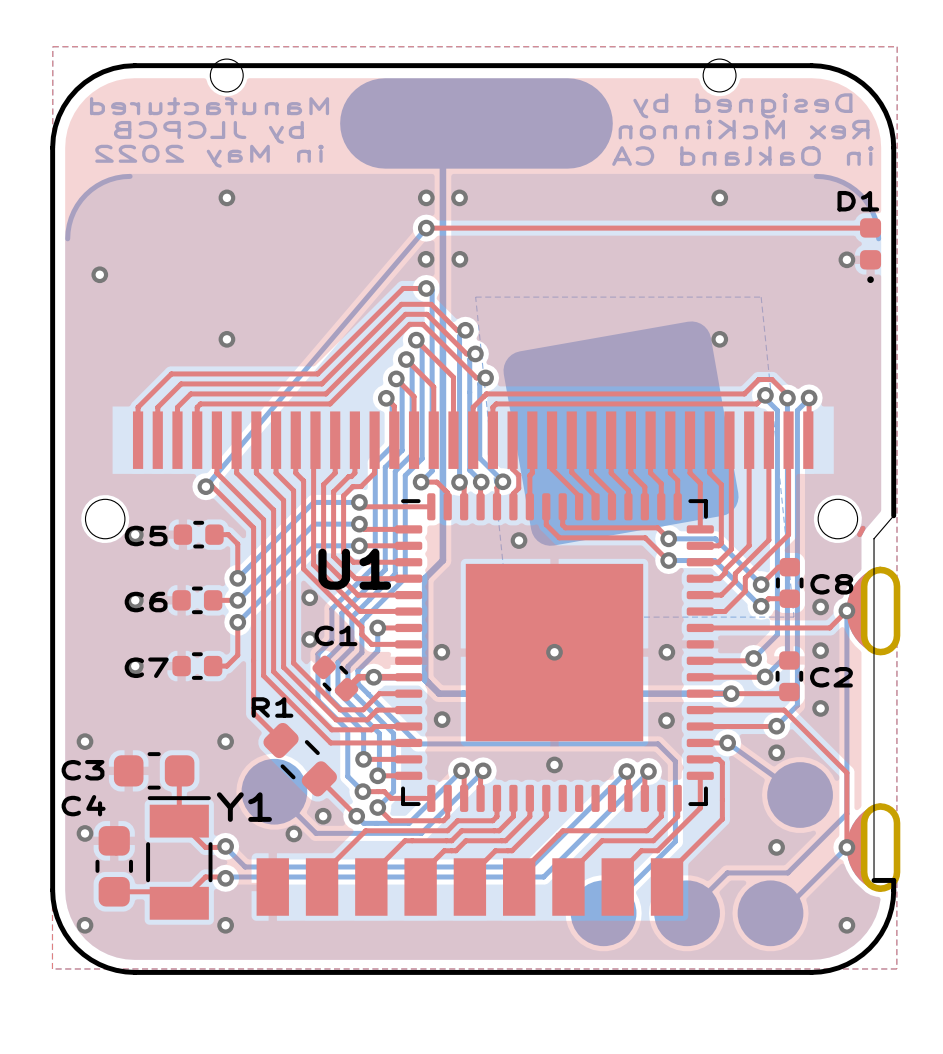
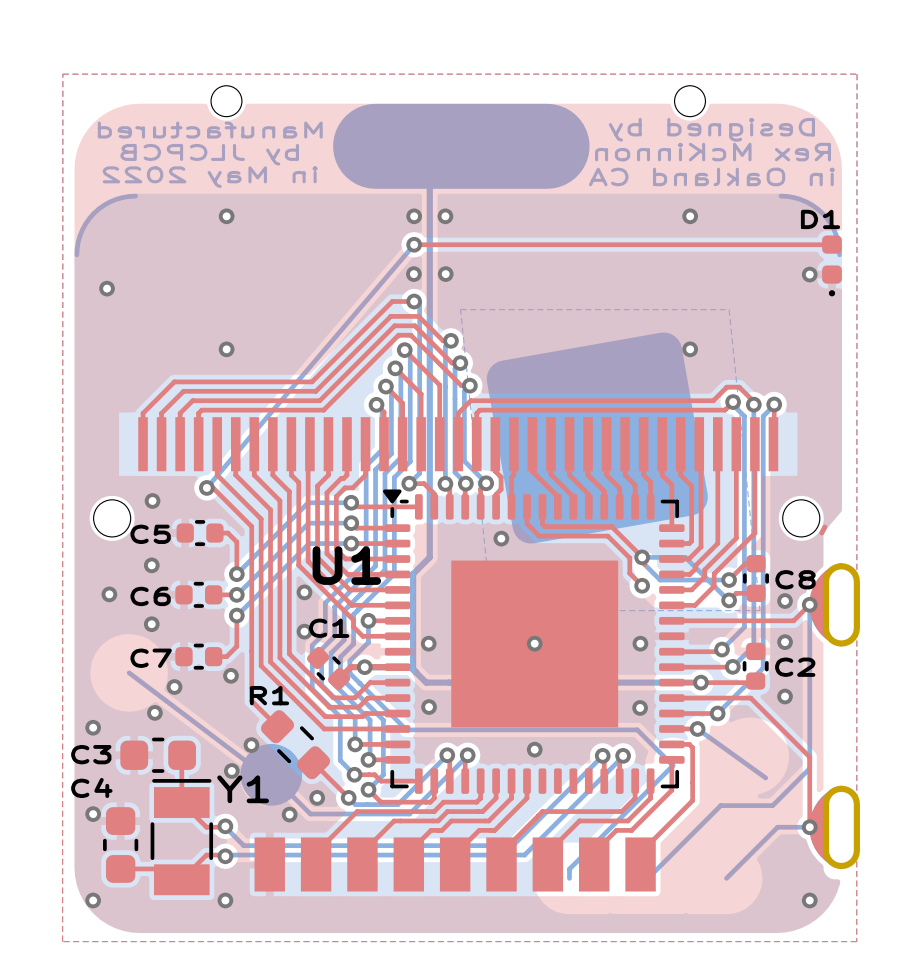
board edge: (134, 65) (811, 65) (829, 67) (847, 73) (862, 83) (875, 96) (889, 120) (893, 147) (893, 515) (874, 538) (874, 880) (893, 880) (893, 890) (891, 908) (885, 925) (875, 941) (862, 954) (838, 967) (811, 972) (134, 972) (116, 970) (99, 964) (83, 954) (70, 941) (57, 917) (52, 890) (53, 137) (63, 106) (84, 82) (113, 68) (134, 65) -> none
U1 footprint: [395, 493, 714, 812] -> [383, 489, 685, 794]
via: none -> (152, 500)
top track: (636, 527) (657, 527) (668, 538) -> (611, 526) (644, 559) (644, 564)
via: (135, 534) -> none
top track: (632, 537) (645, 537) (668, 560) -> (607, 536) (629, 558) (629, 573) (642, 585)
bottom track: (668, 538) (715, 538) (761, 584) -> (644, 564) (660, 580) (729, 580)
via position: (668, 538) -> (642, 585)
via: none -> (151, 565)
via: none -> (109, 594)
via: (135, 600) -> none
via: none -> (151, 624)
via: (135, 666) -> none
bottom track: (797, 678) (797, 705) (776, 726) -> (763, 667) (717, 713)
bottom track: none -> (129, 672) (268, 777)
via: none -> (230, 675)
via: none -> (174, 687)
via: none -> (154, 712)
top track: (748, 726) (776, 726) -> none
via: none -> (717, 713)
via: (776, 726) -> none
via: (225, 741) -> none
bottom track: (657, 743) (675, 761) (675, 841) (603, 913) -> (632, 729) (637, 729) (673, 765) (569, 869) (569, 878)
via: (776, 752) -> none
via: none -> (251, 745)
bottom track: (846, 785) (846, 813) (787, 872) (727, 872) (687, 913) -> (809, 768) (772, 805) (720, 805) (647, 878)
via: none -> (231, 770)
part: (800, 795) -> none
via: (776, 847) -> none
bottom track: (846, 847) (781, 913) (770, 913) -> (809, 827) (777, 827) (726, 878)
part: (603, 913) -> none
part: (687, 913) -> none
part: (770, 913) -> none

